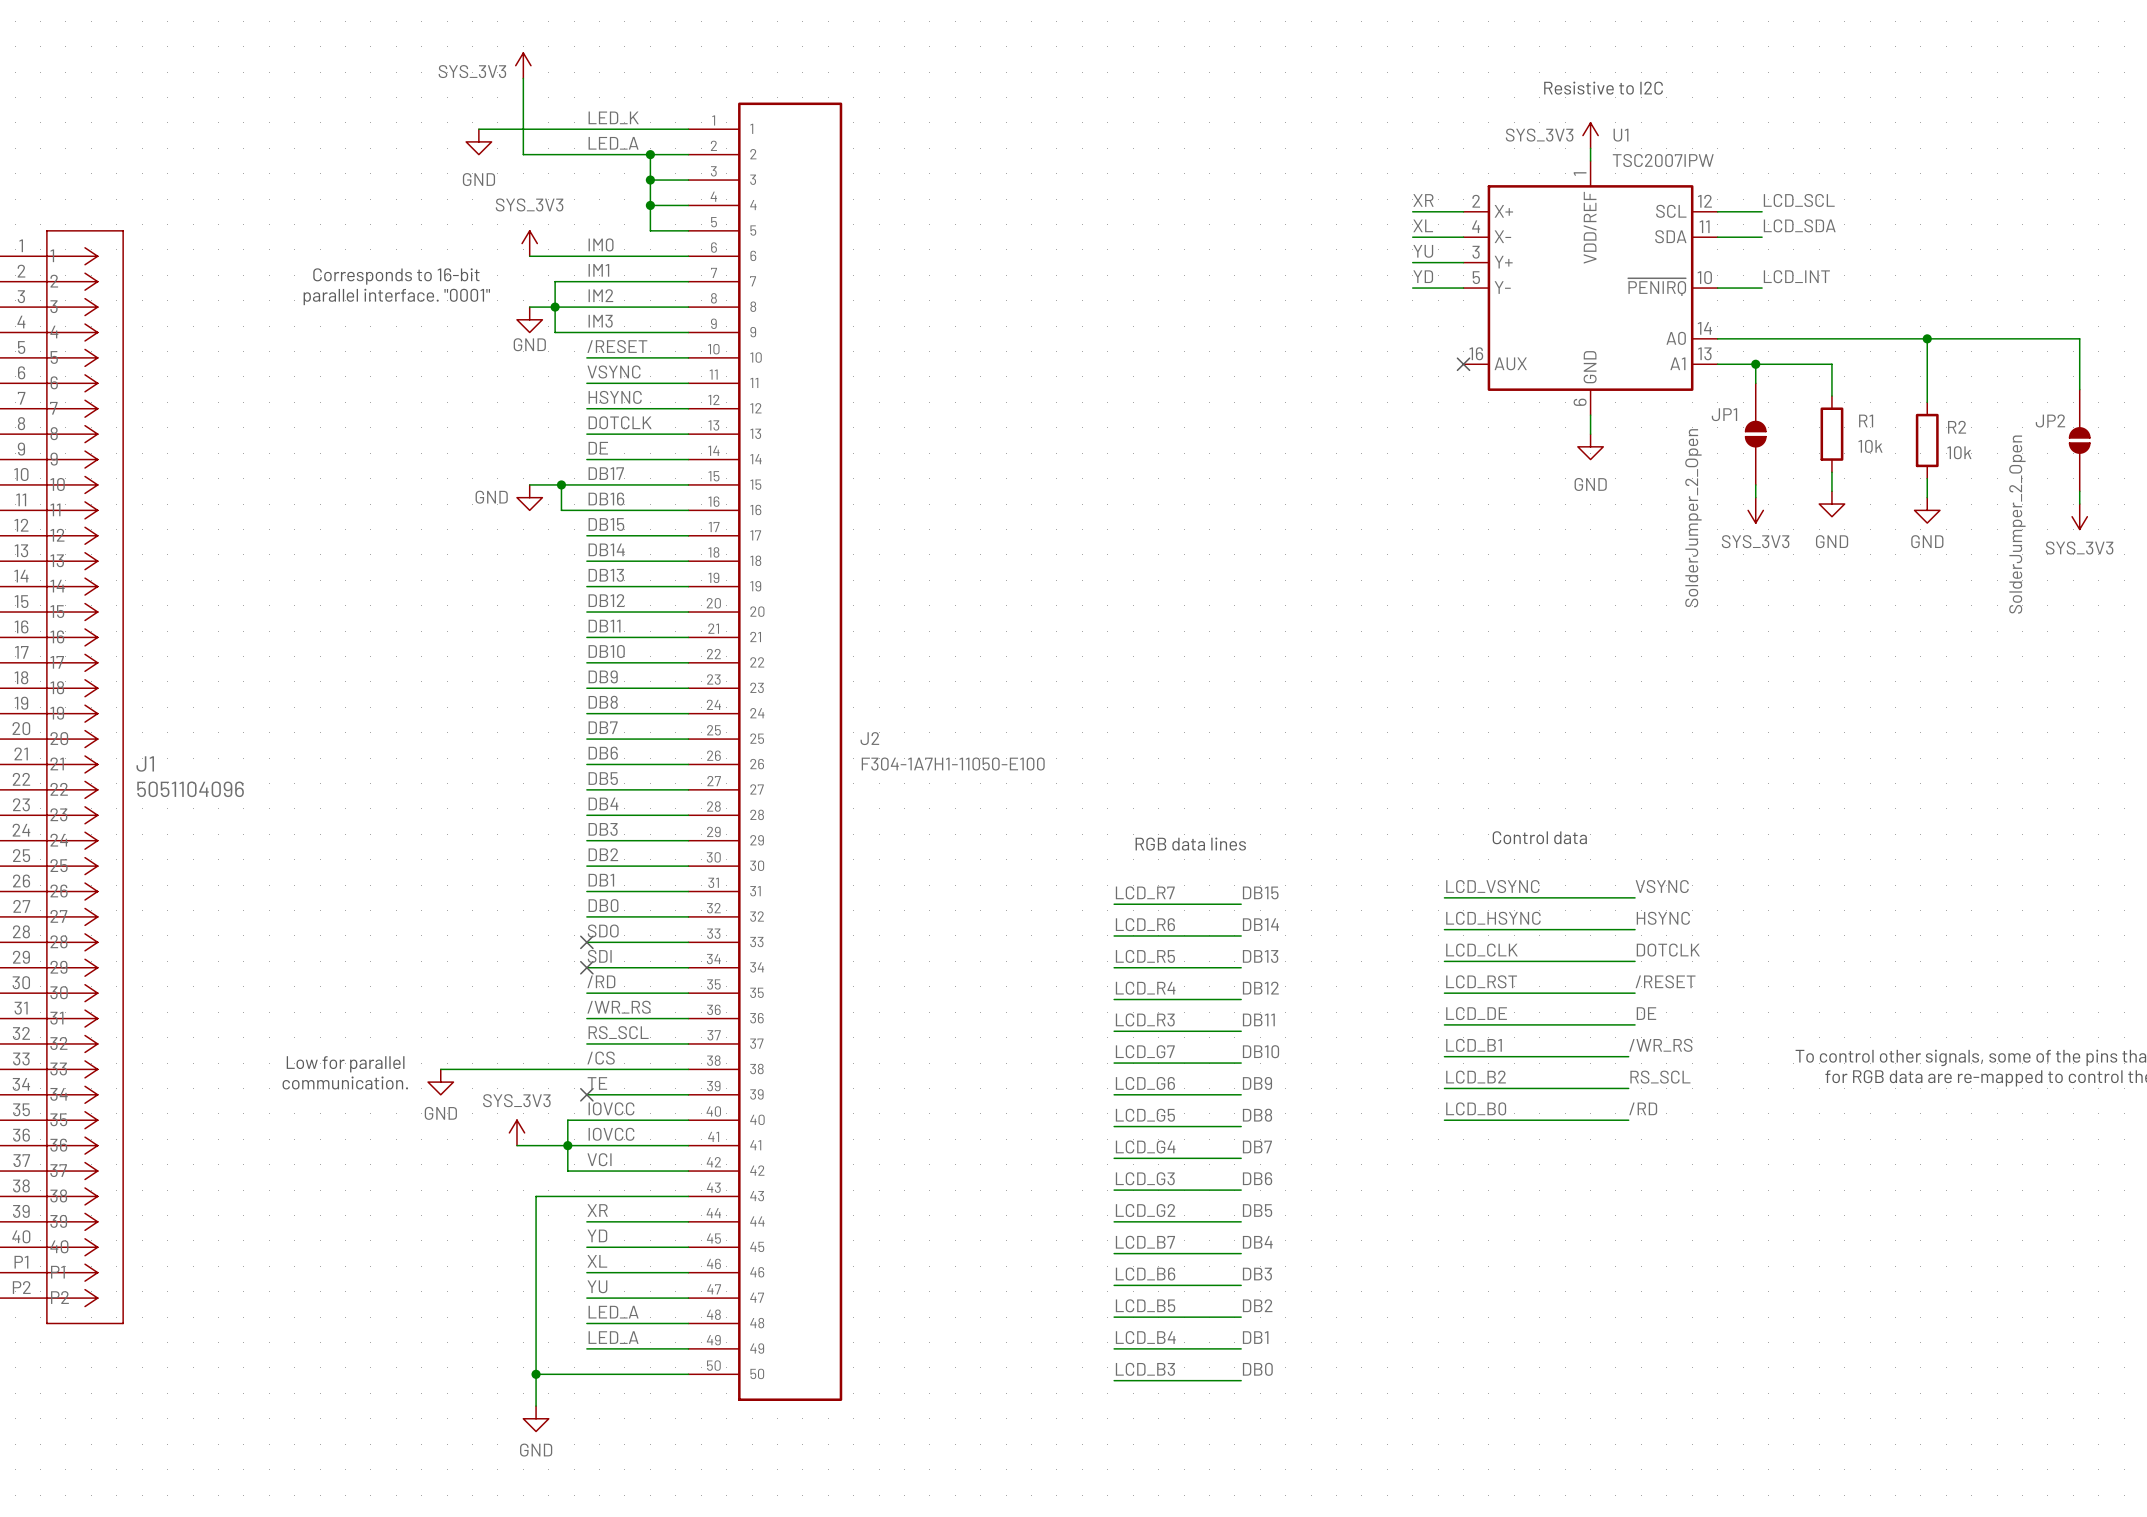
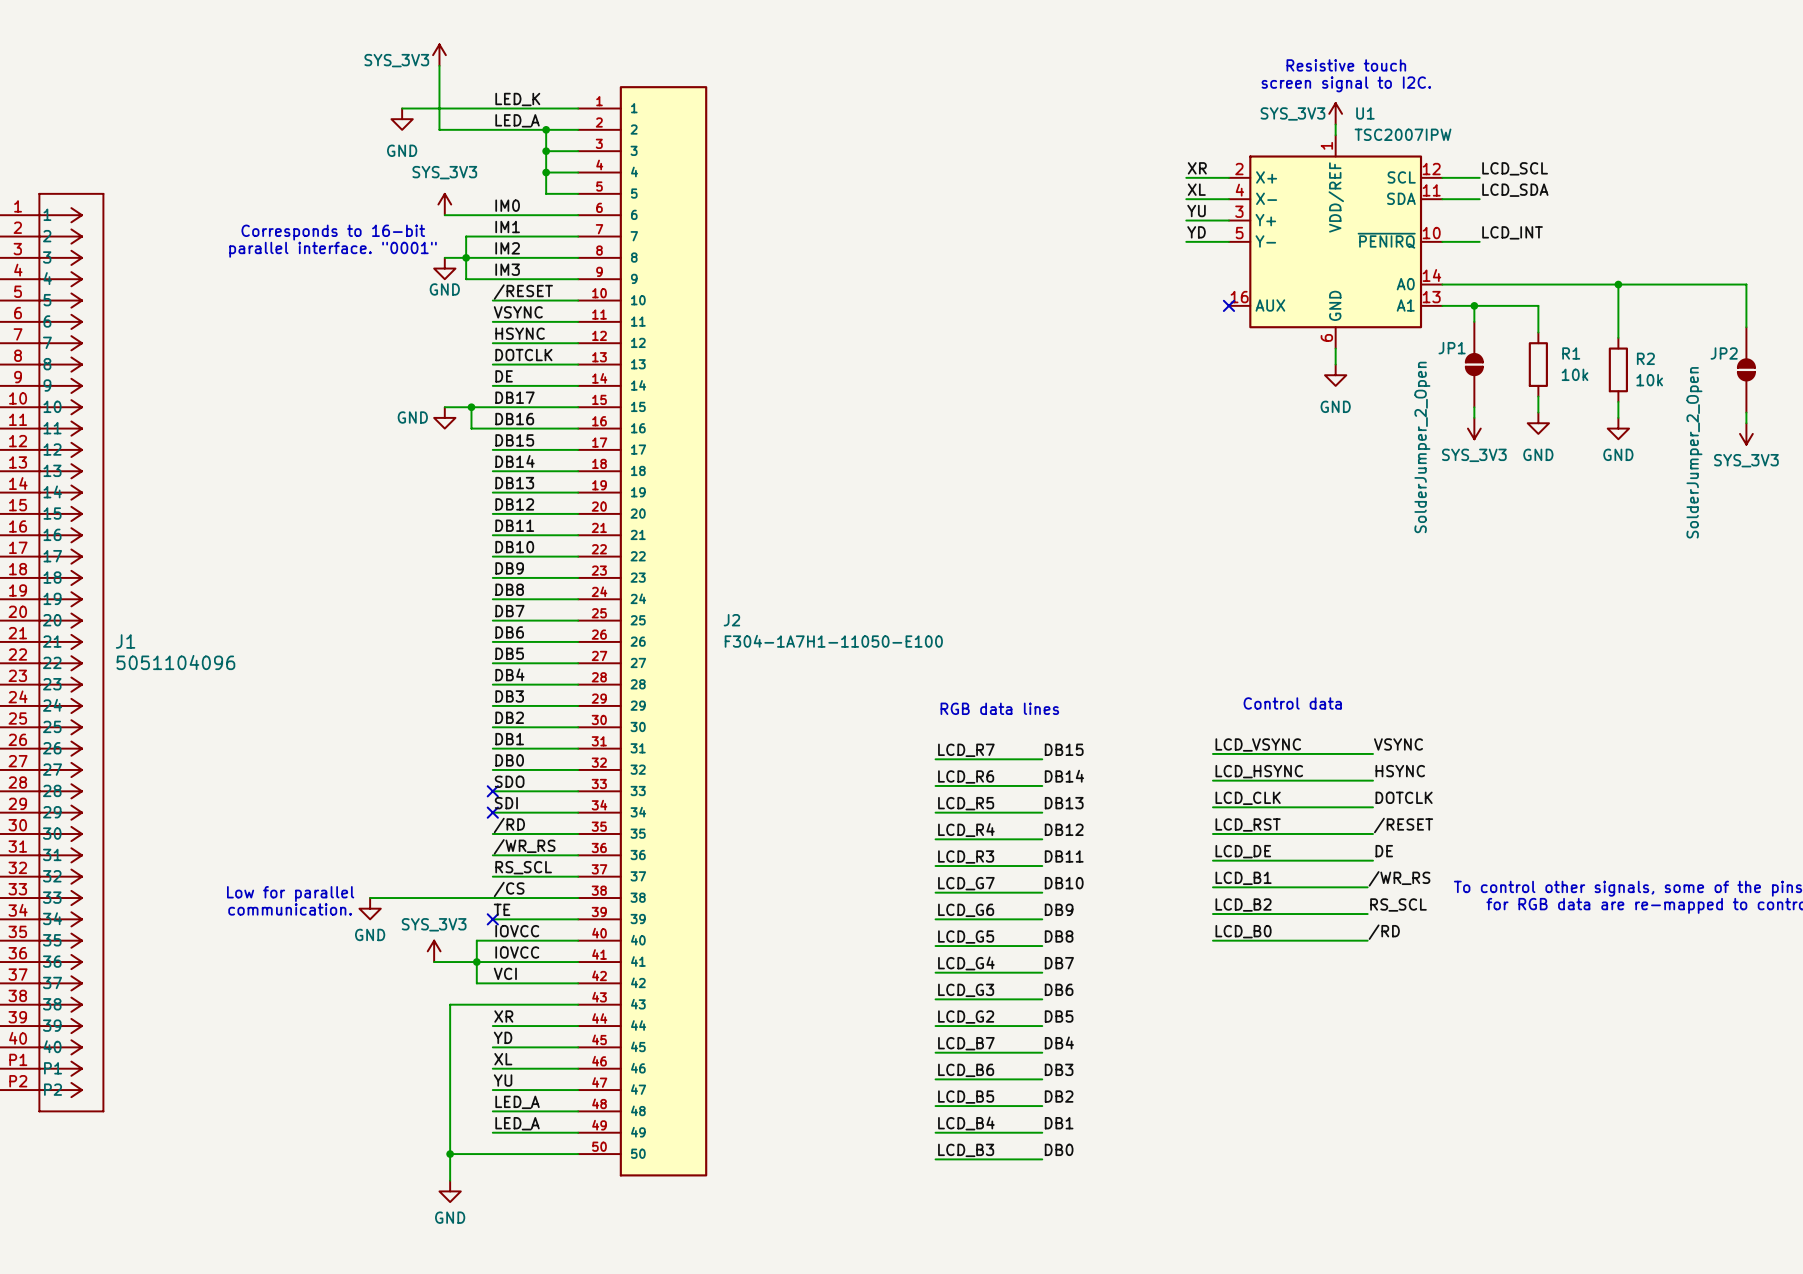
text: Resistive to I2C (1603, 88) -> Resistive touch (1346, 65)
text: none -> screen signal to I2C. (1346, 84)

